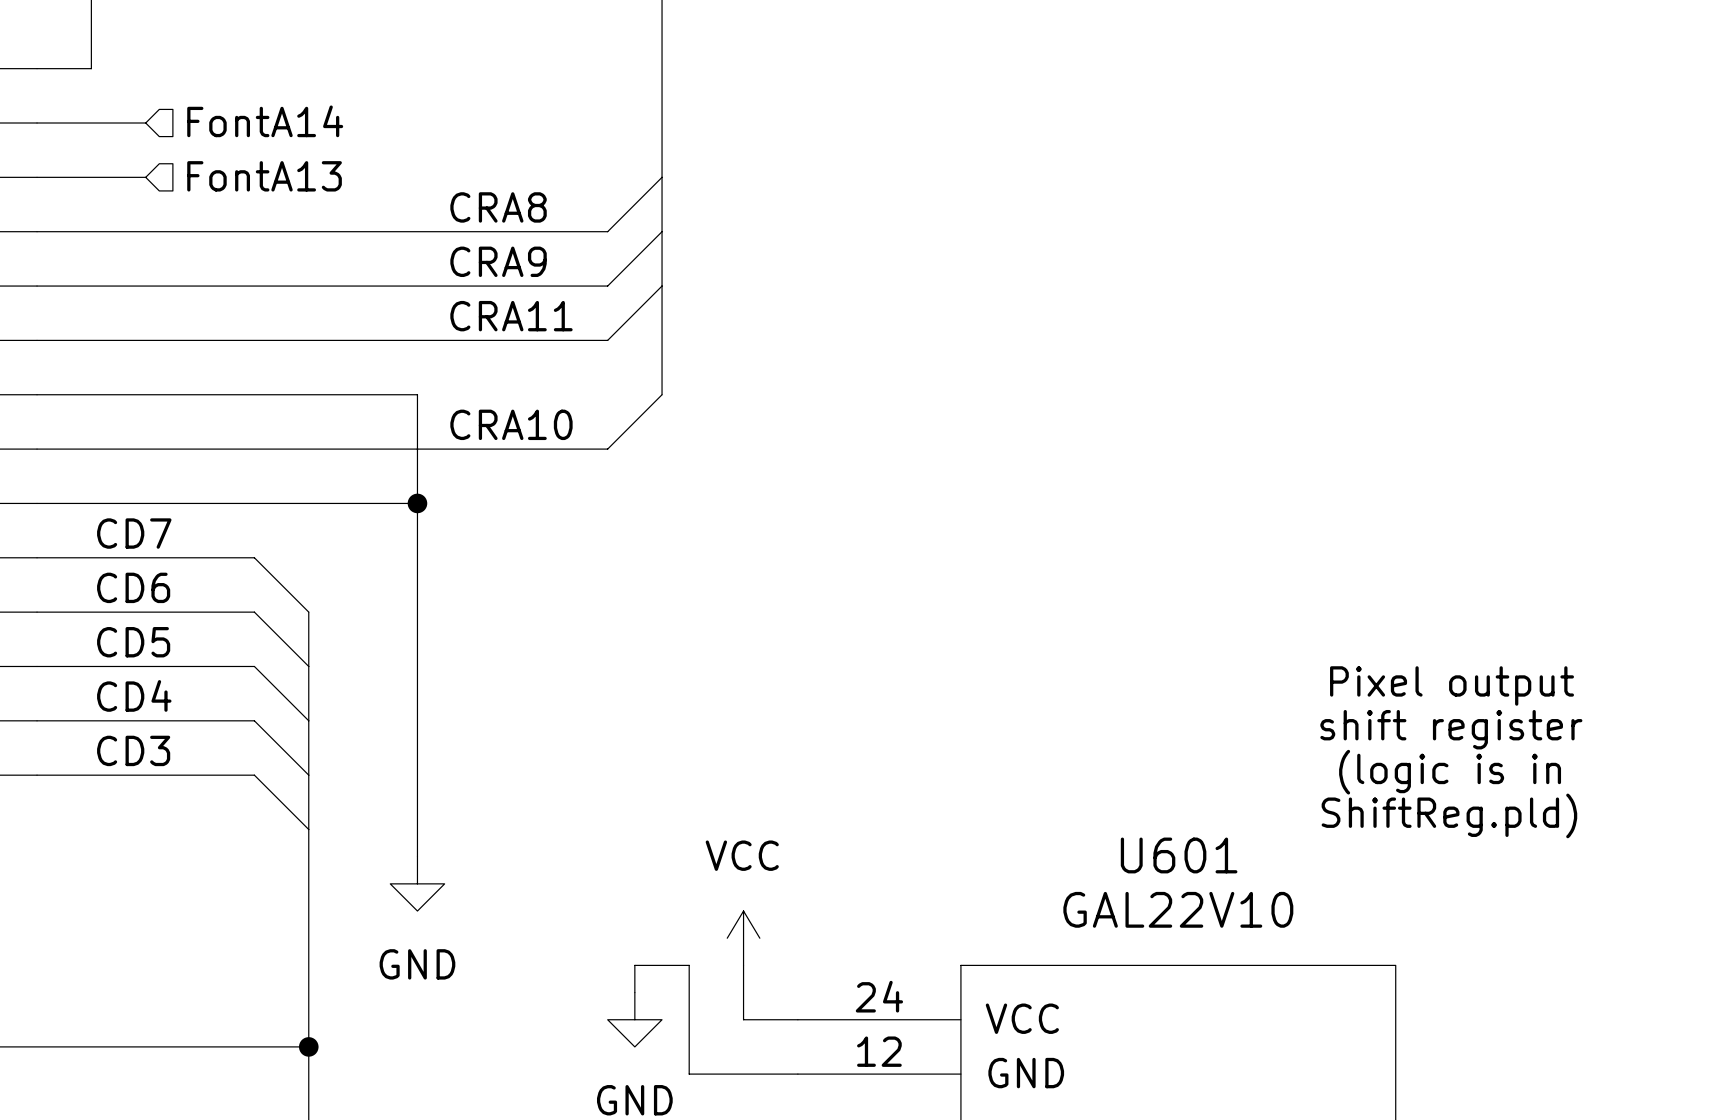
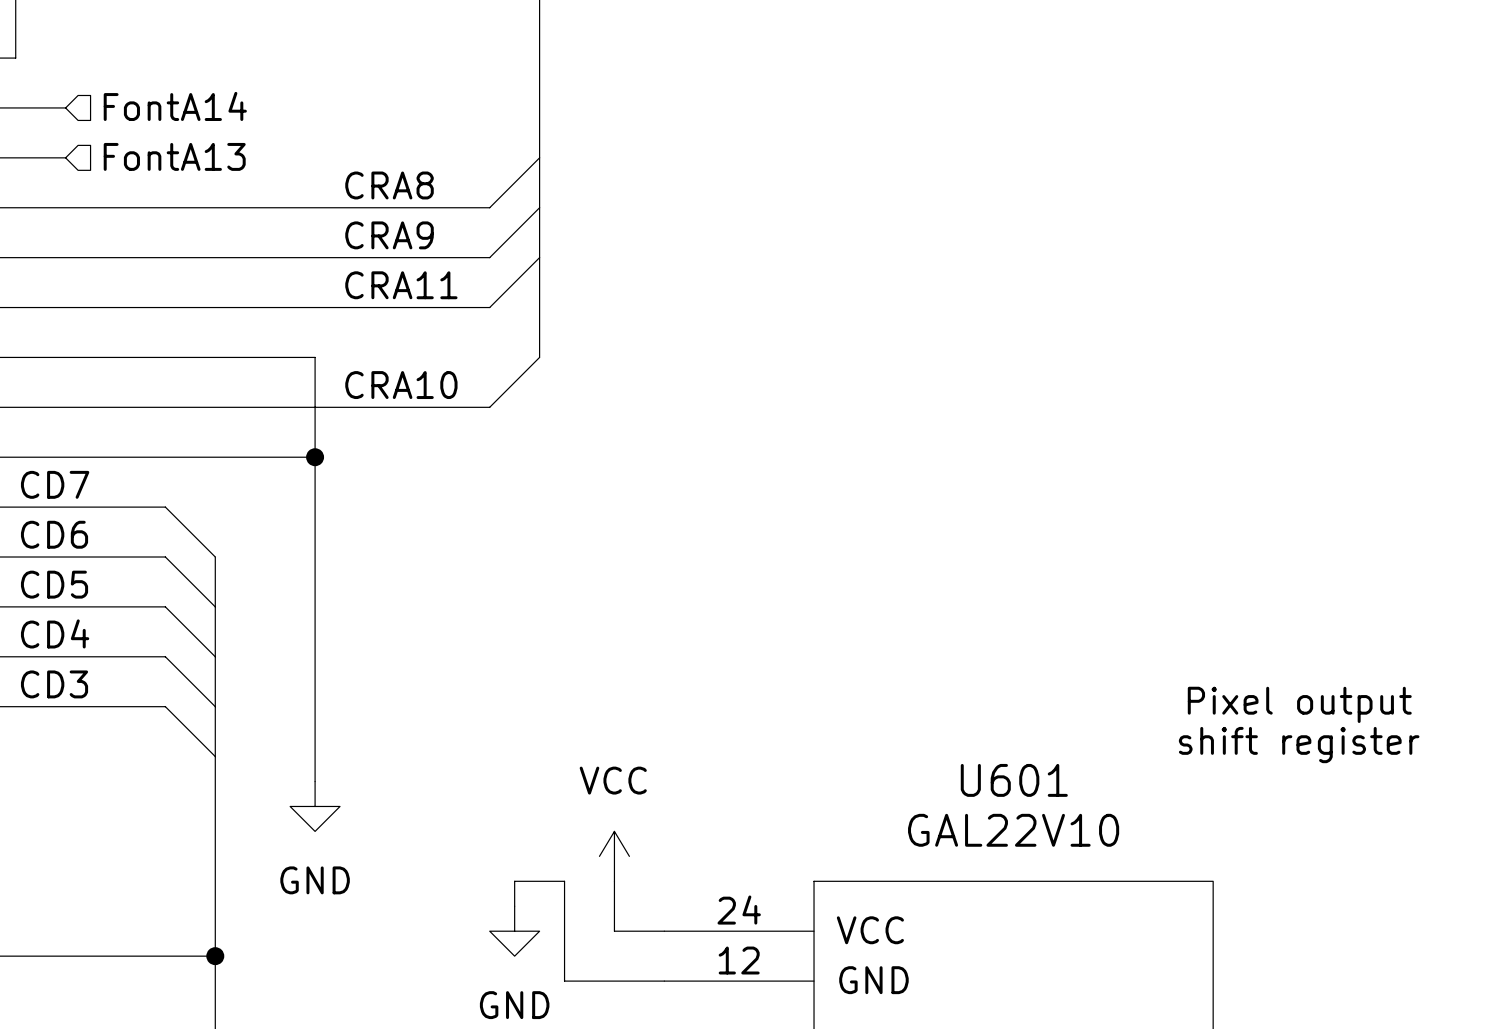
text position: Pixel output (1452, 685) -> Pixel output (1299, 704)
text position: shift register (1451, 729) -> shift register (1299, 745)
text: (logic is in (1450, 772) -> none
text: ShiftReg.pld) (1449, 815) -> none

